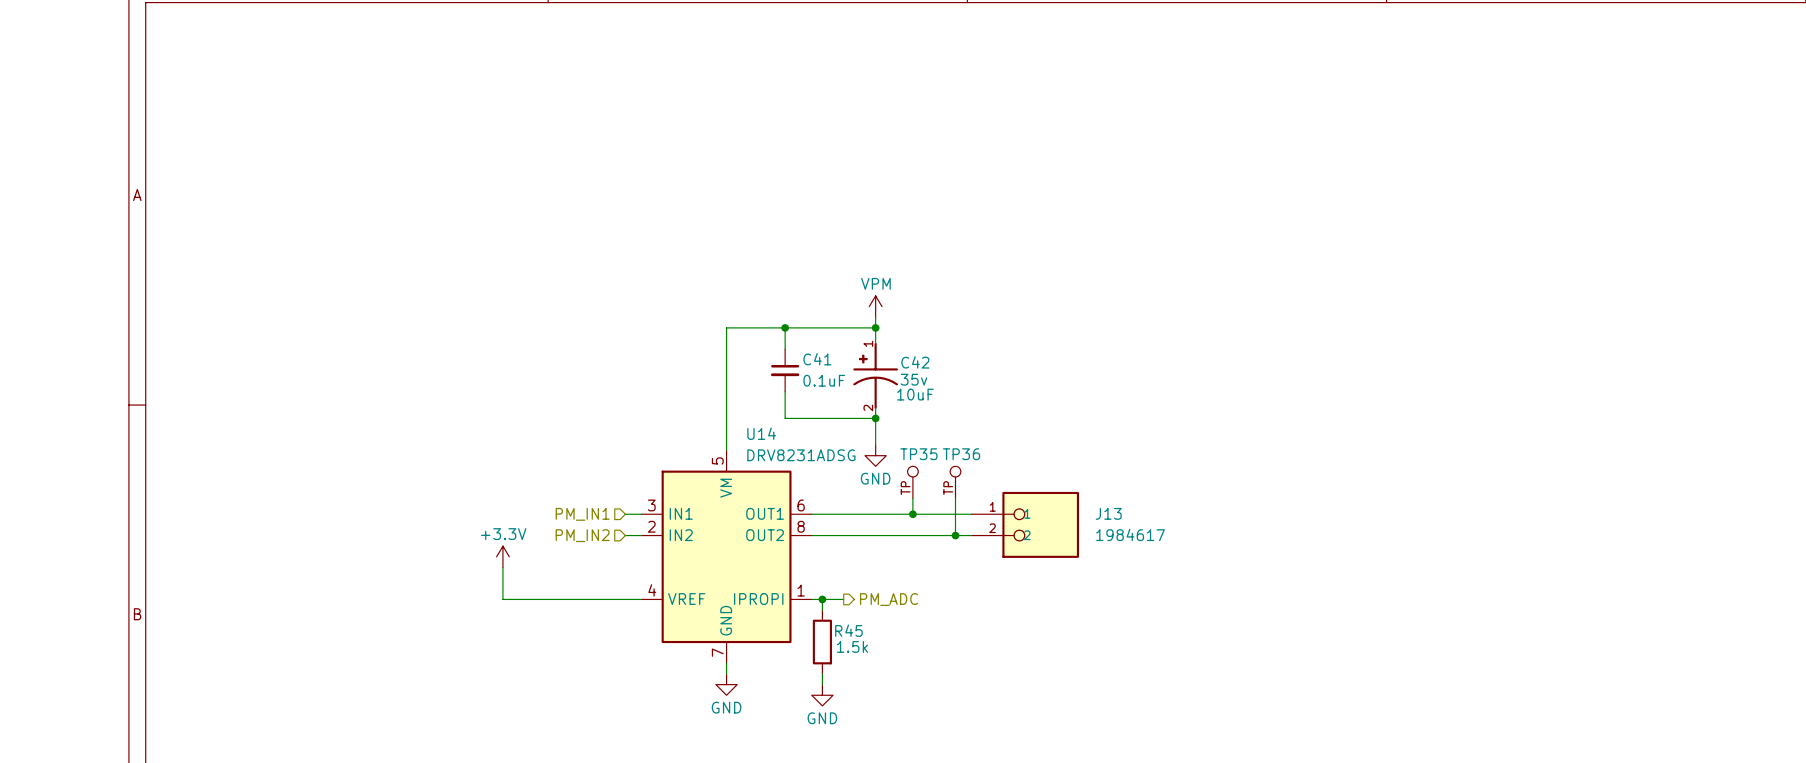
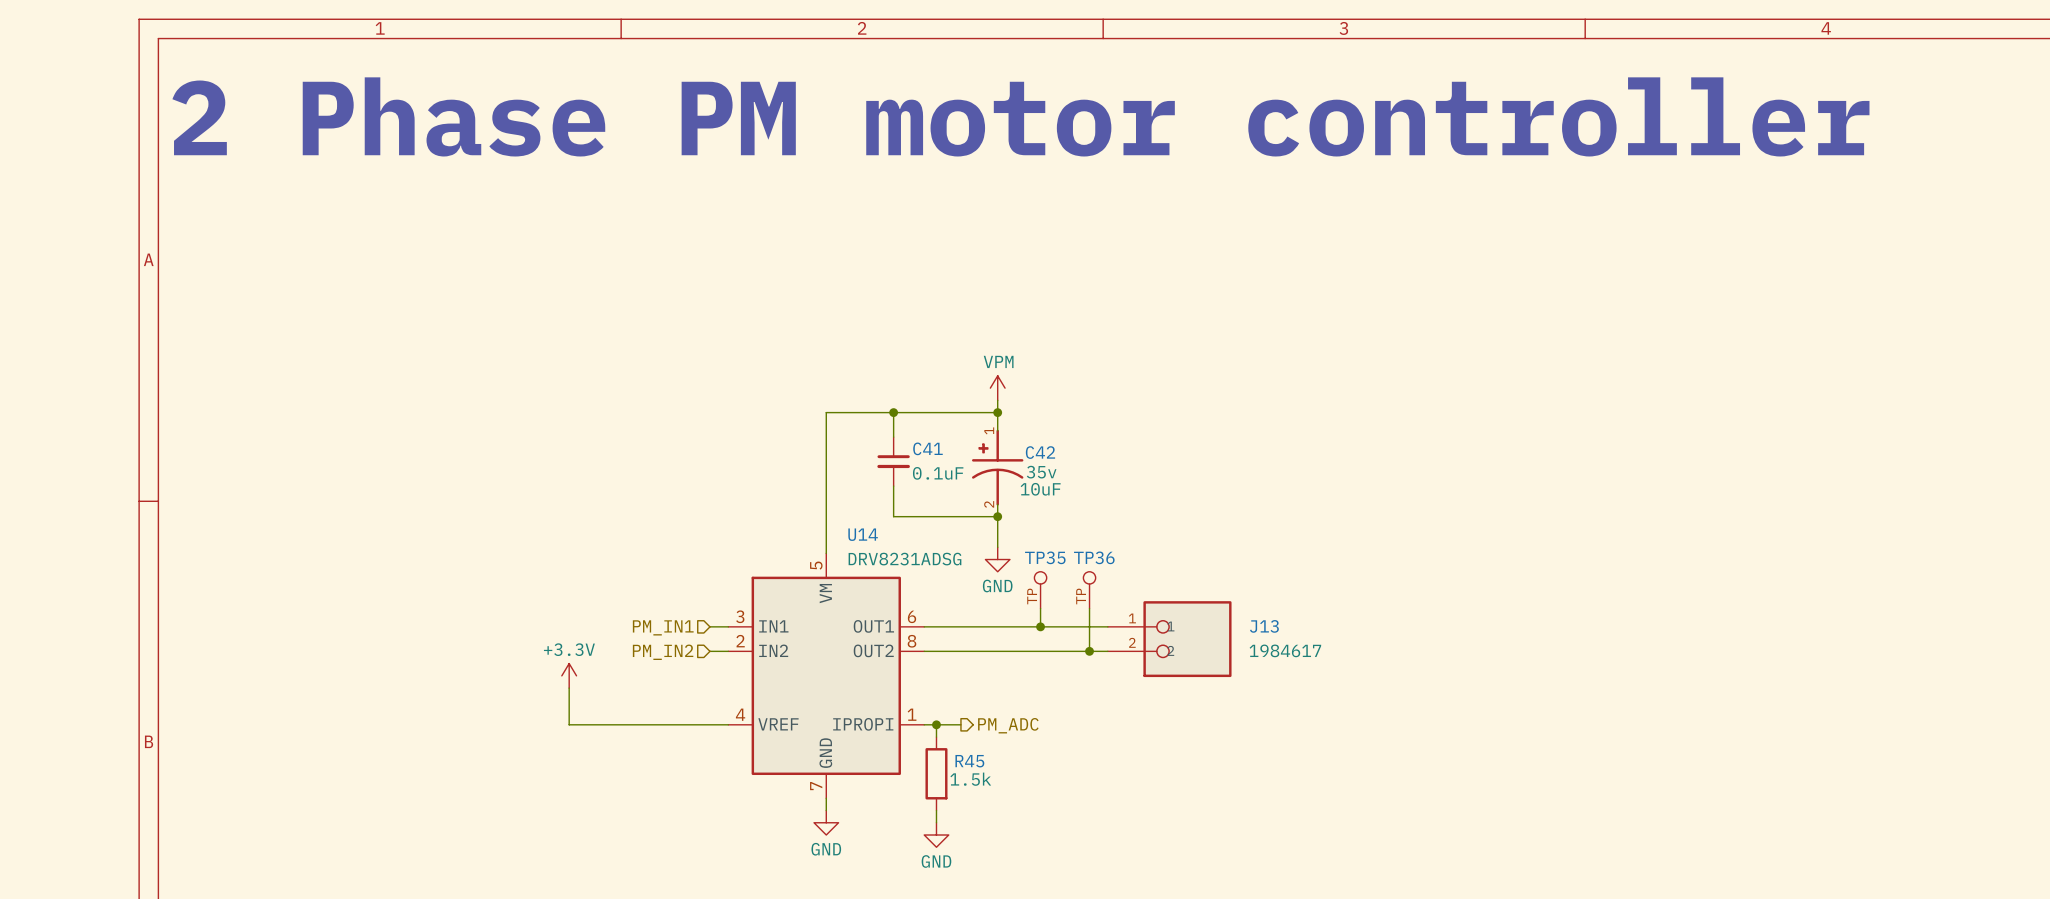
text: none -> 2 Phase PM motor controller (1020, 116)

